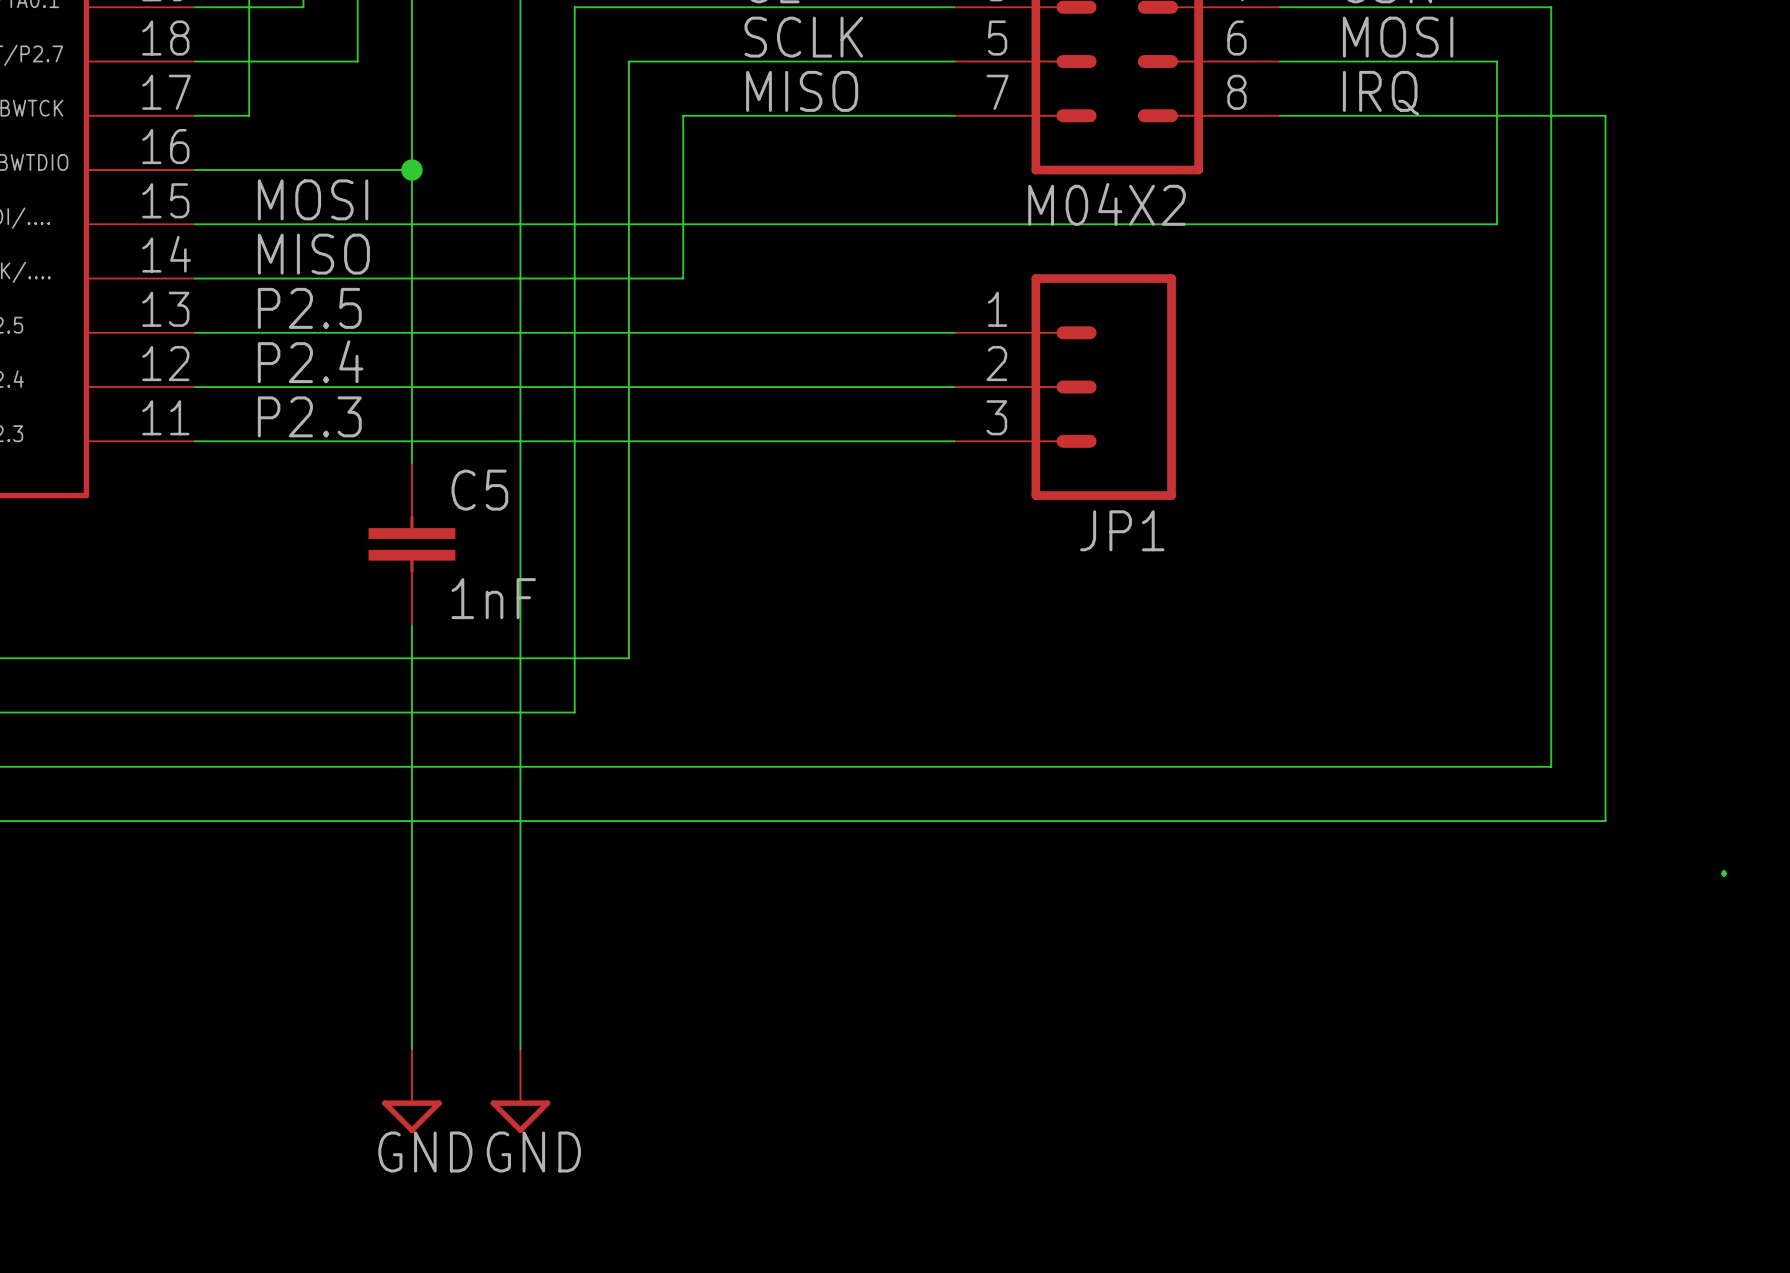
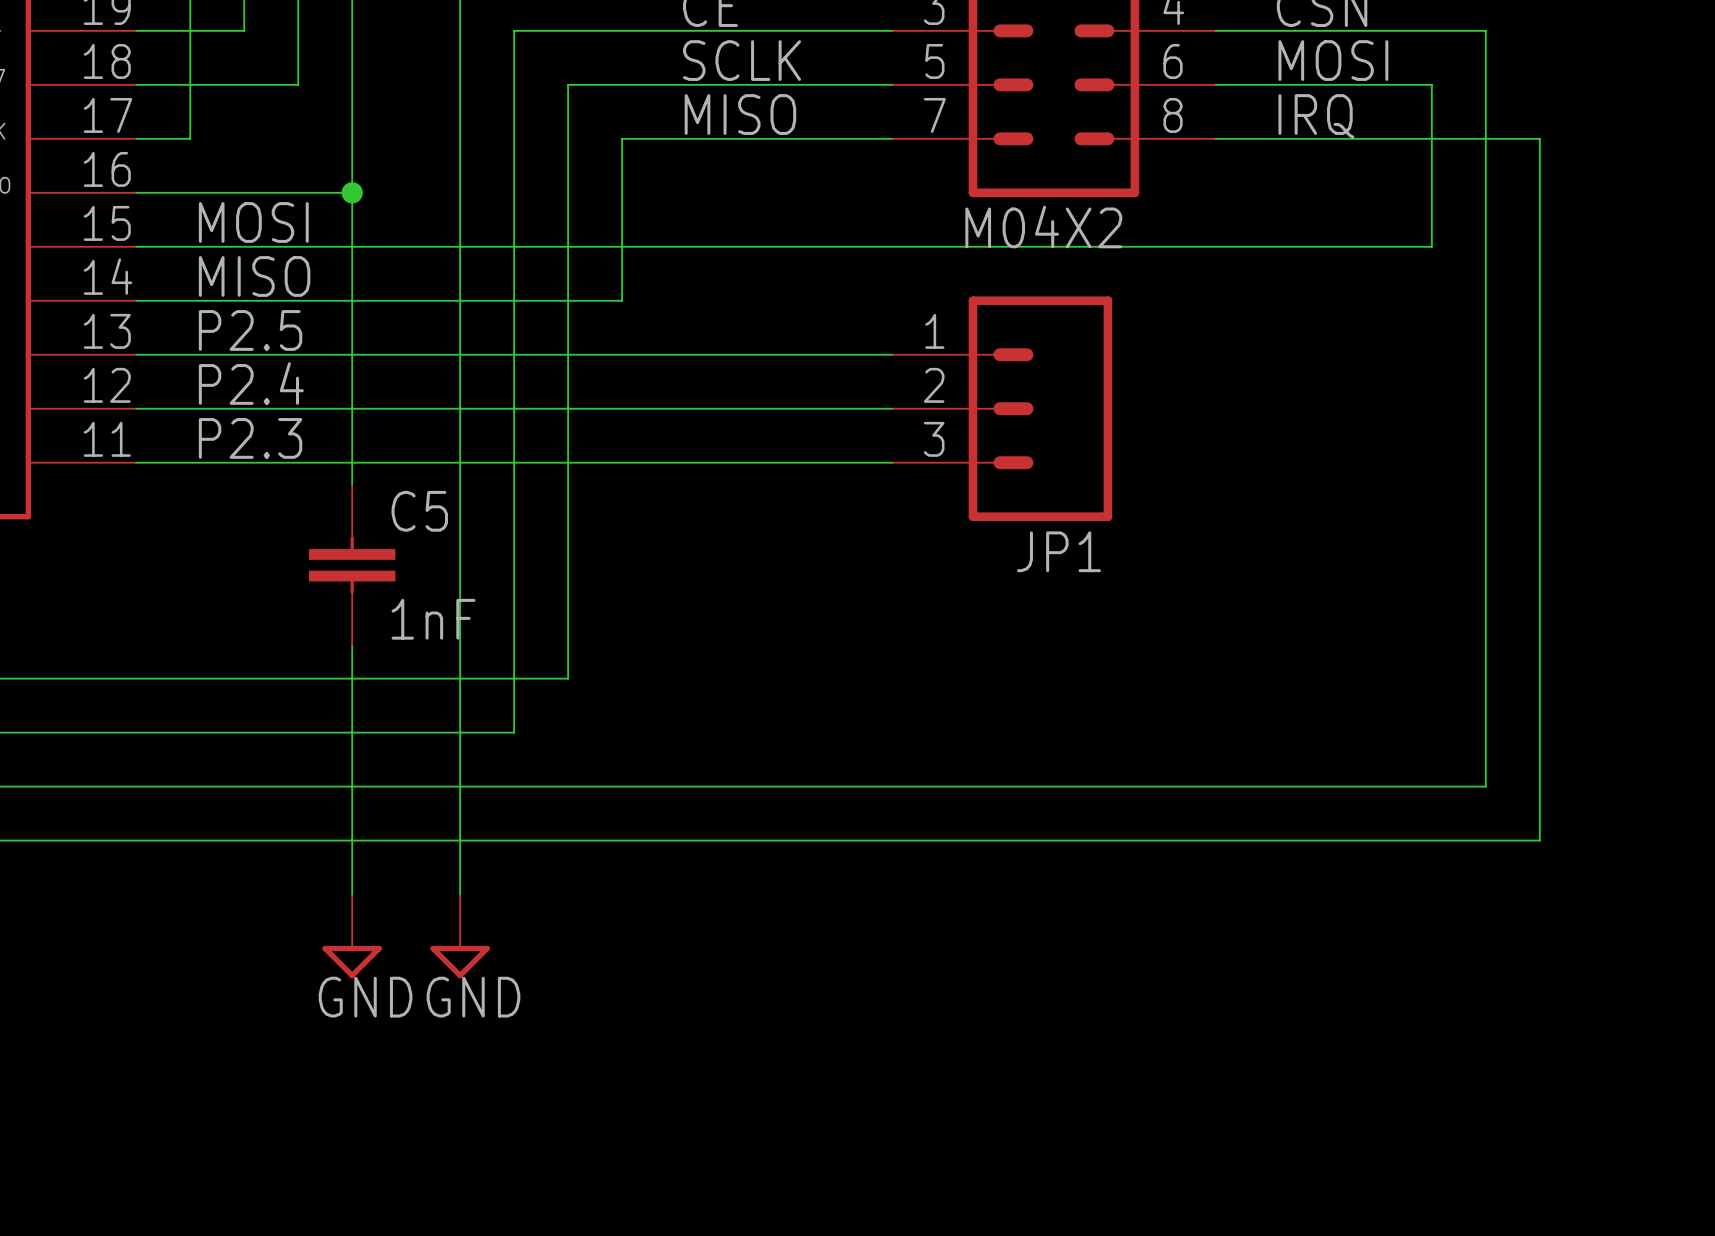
text: . (1724, 873) -> none
wire: (411, 875) (411, 1048) -> none
wire: (520, 875) (520, 1048) -> none
power symbol: none -> GND (352, 936)
power symbol: none -> GND (460, 936)
power symbol: GND (411, 1090) -> none
power symbol: GND (520, 1090) -> none

